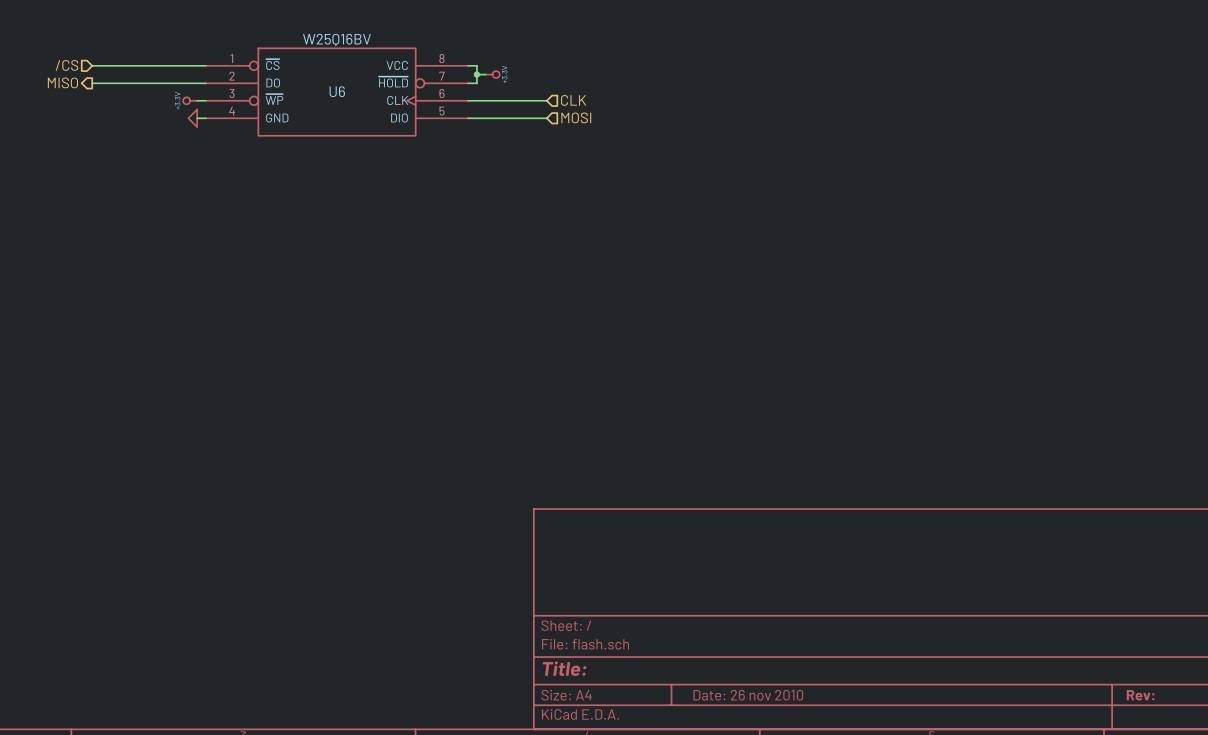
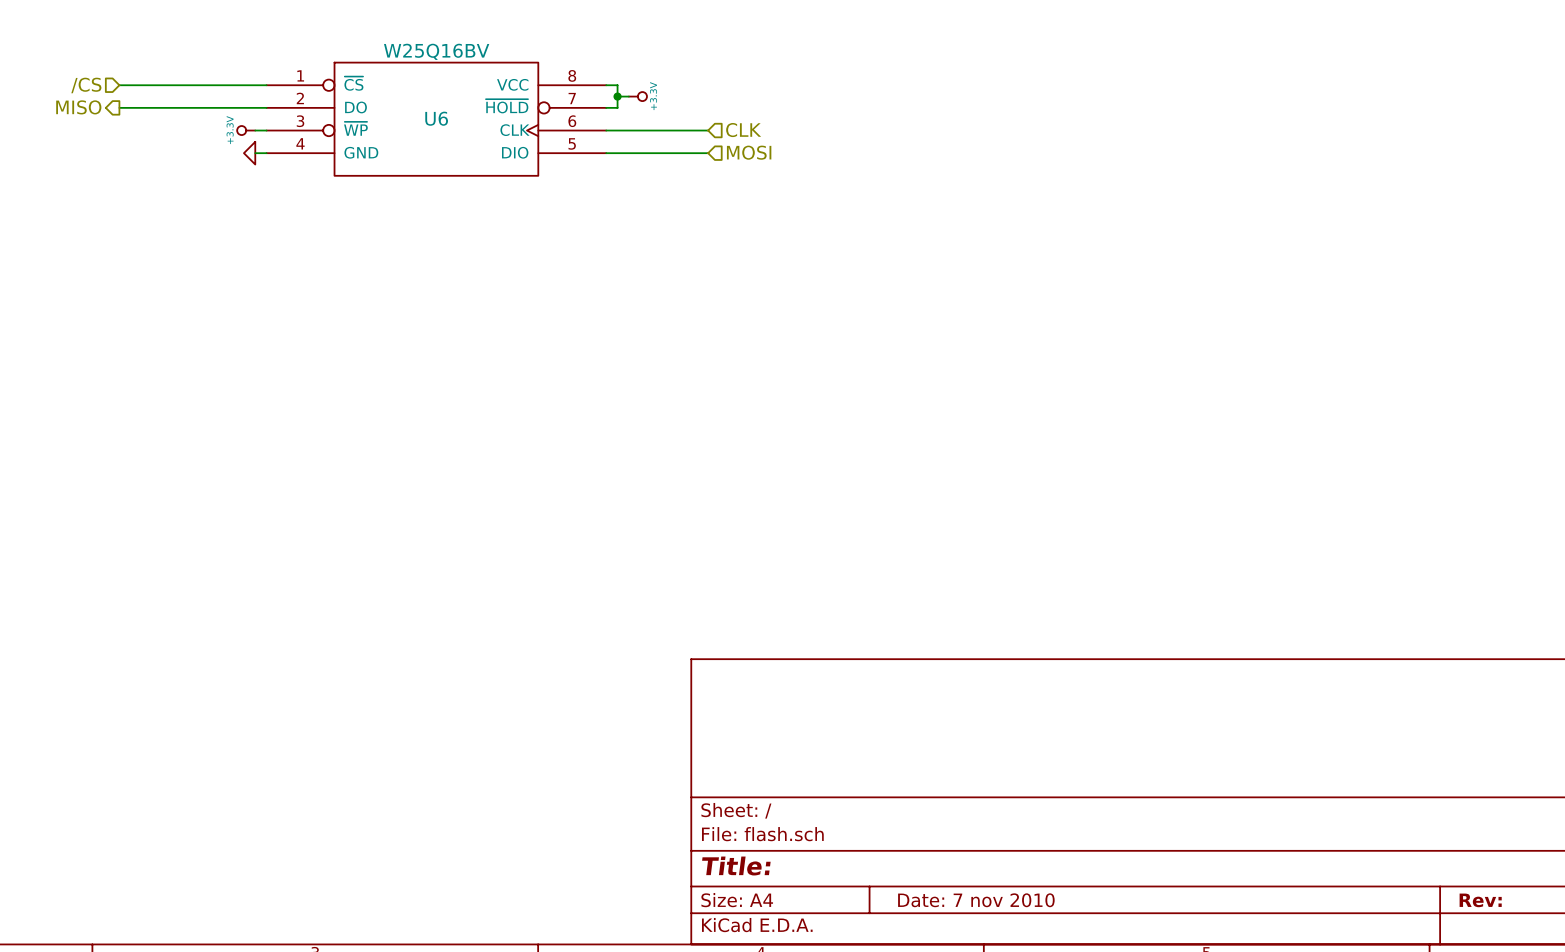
title block: Date: 26 nov 2010 (748, 695) -> Date: 7 nov 2010 (976, 900)

